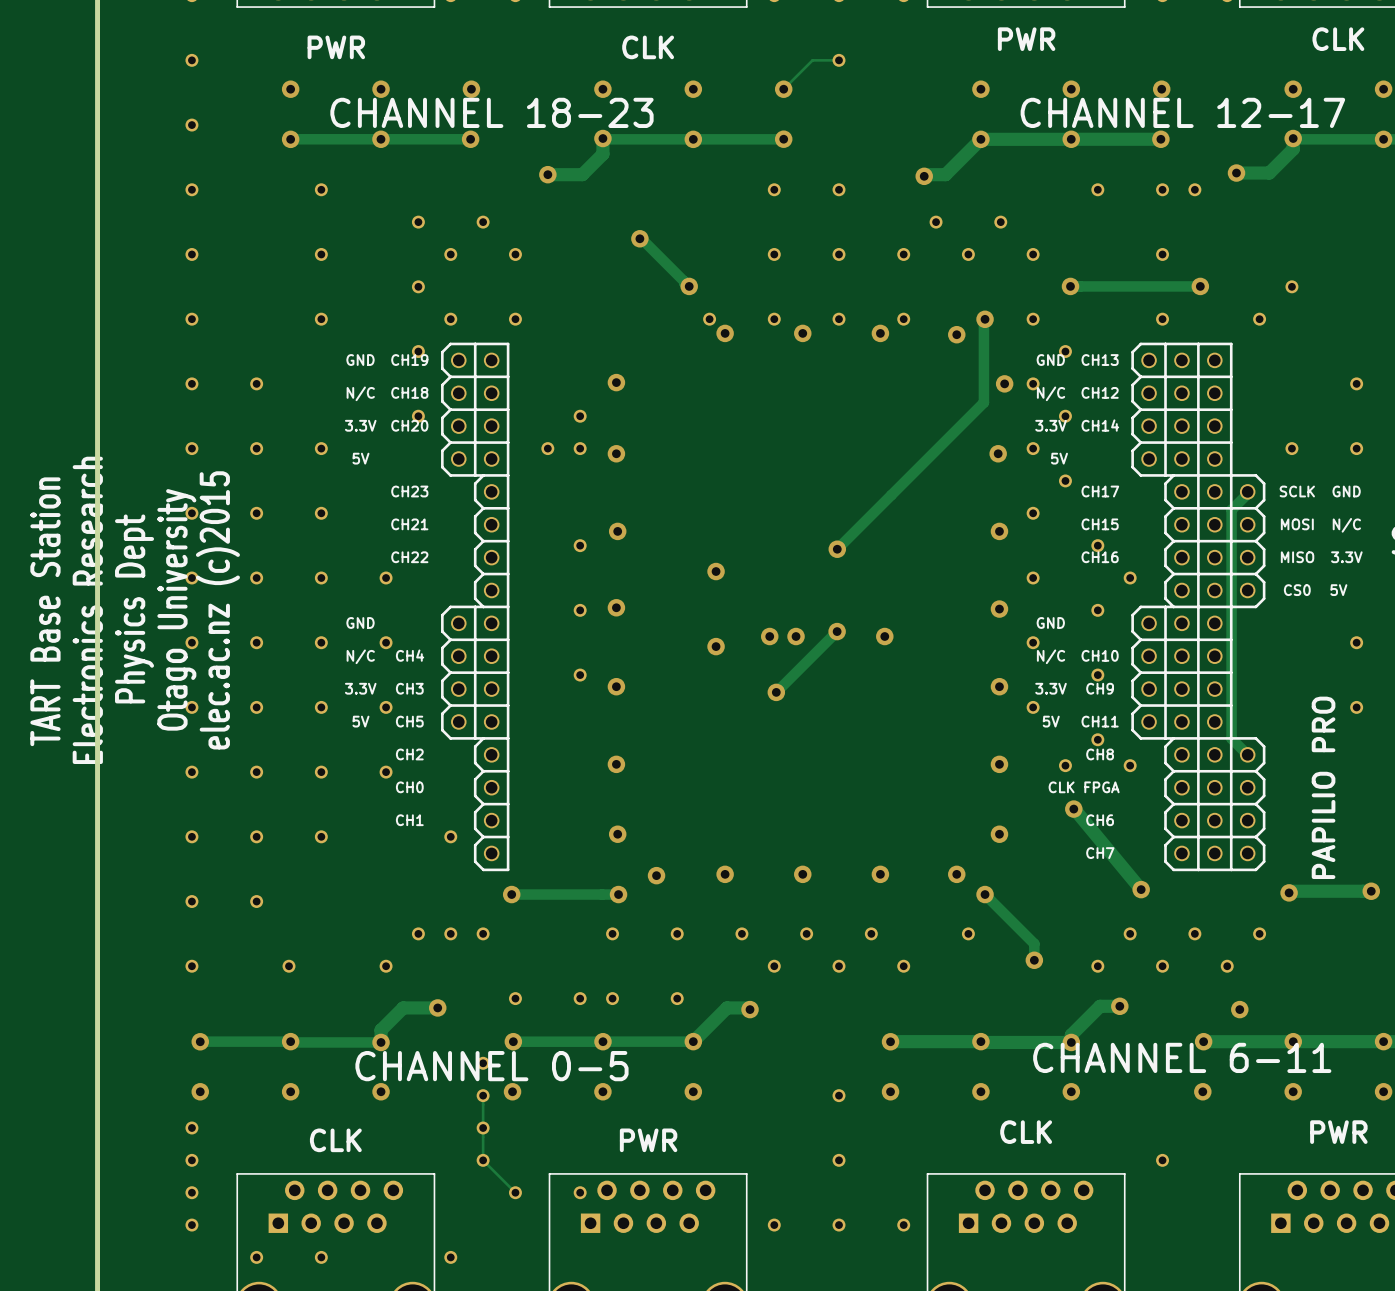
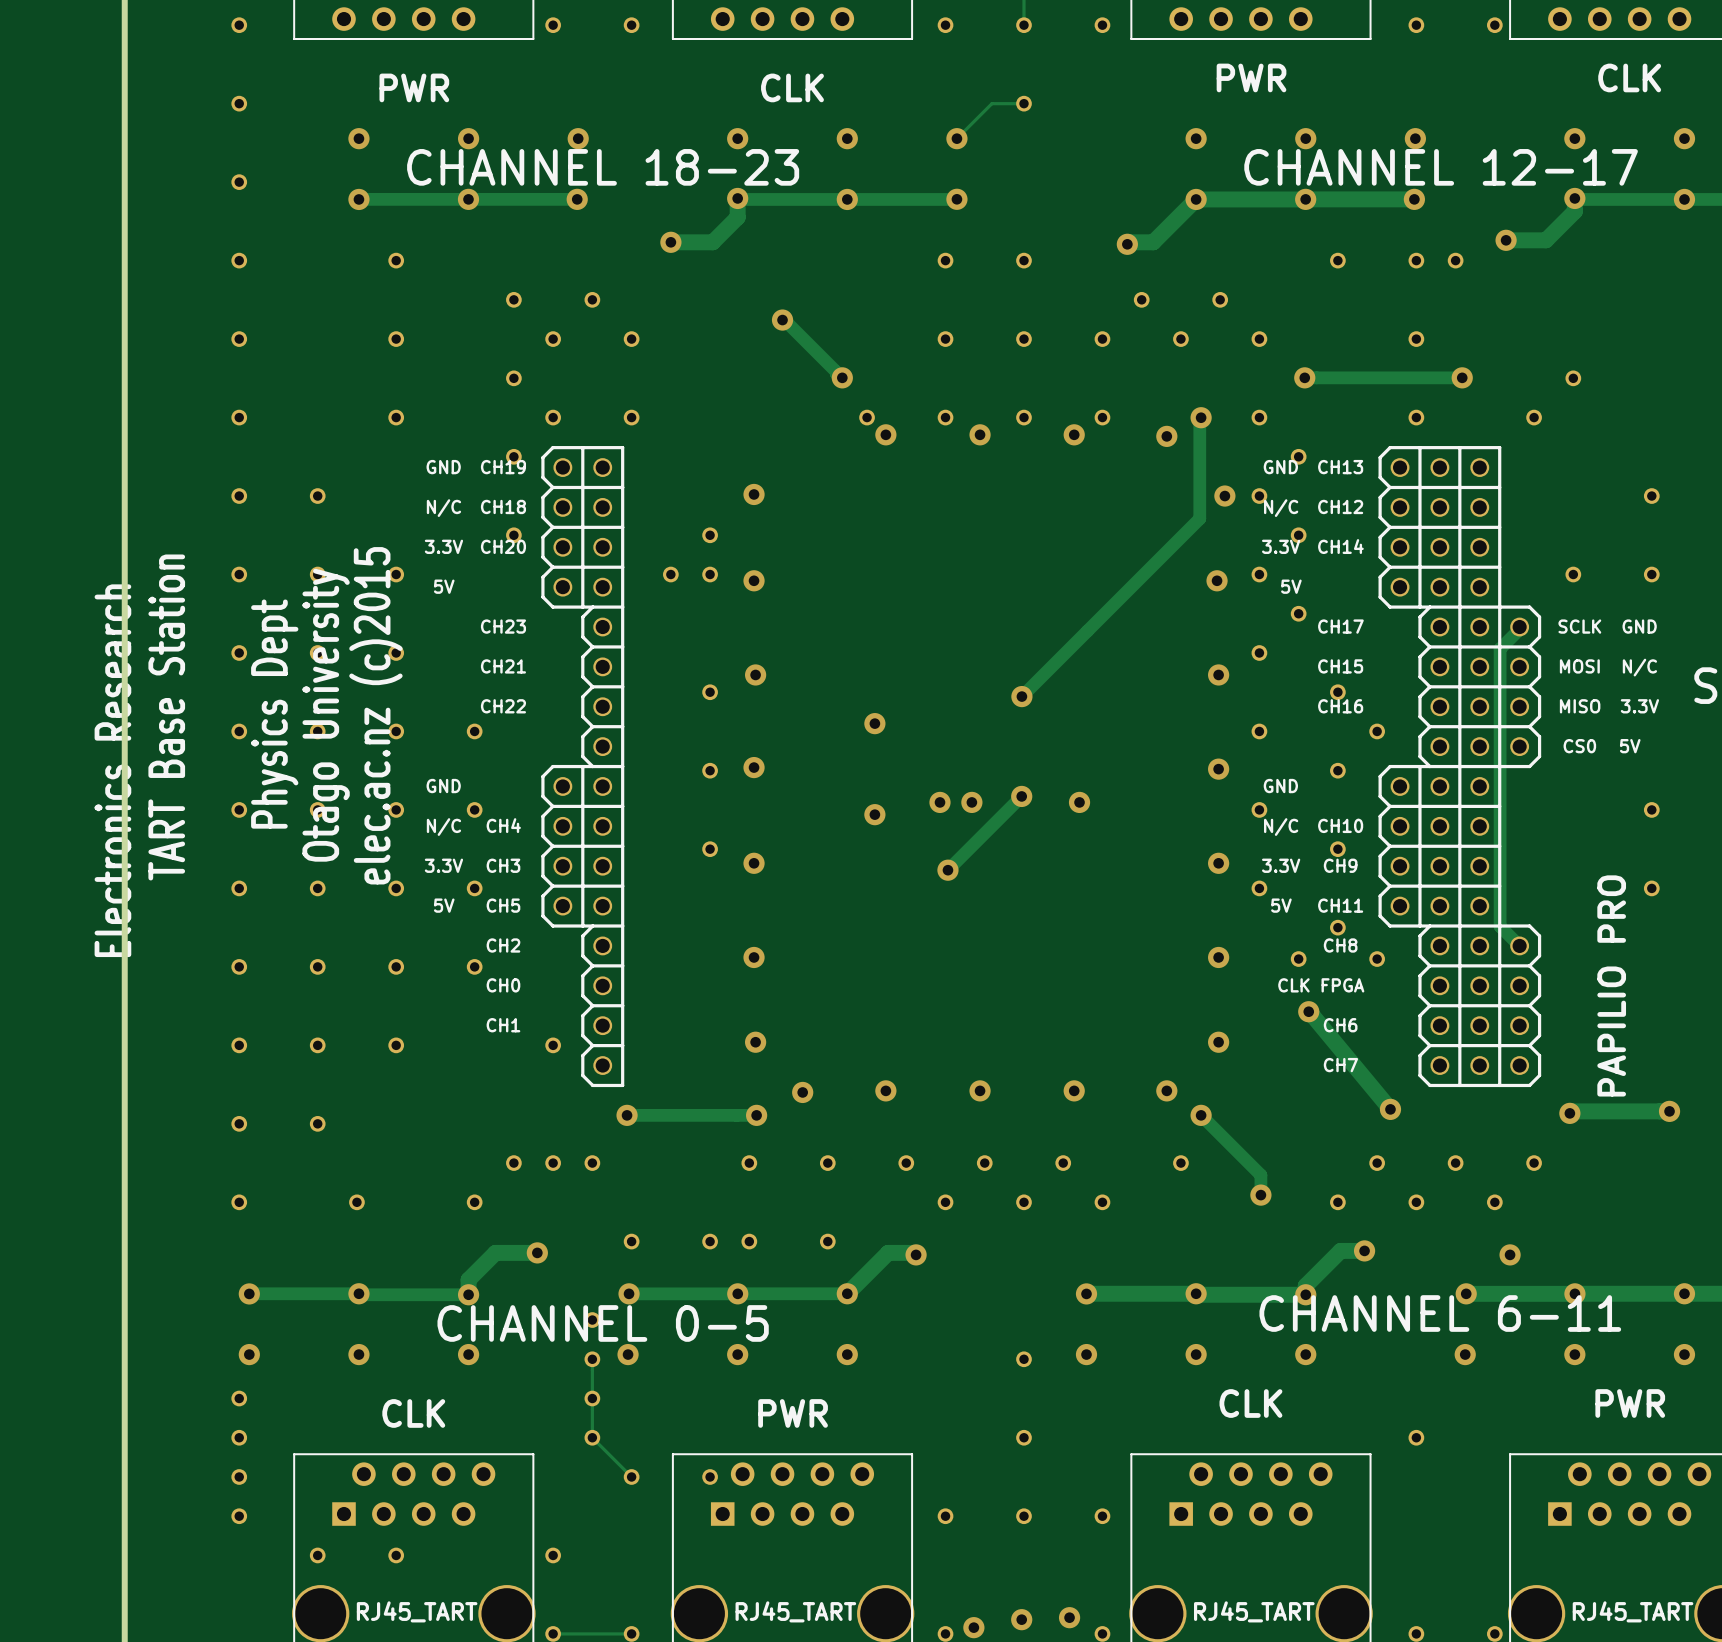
text position: Physics Dept (134, 608) -> Physics Dept (274, 714)
text position: Otago University (176, 609) -> Otago University (326, 715)
text position: elec.ac.nz (c)2015 (217, 610) -> elec.ac.nz (c)2015 (375, 715)
text position: TART Base Station (45, 611) -> TART Base Station (166, 717)

